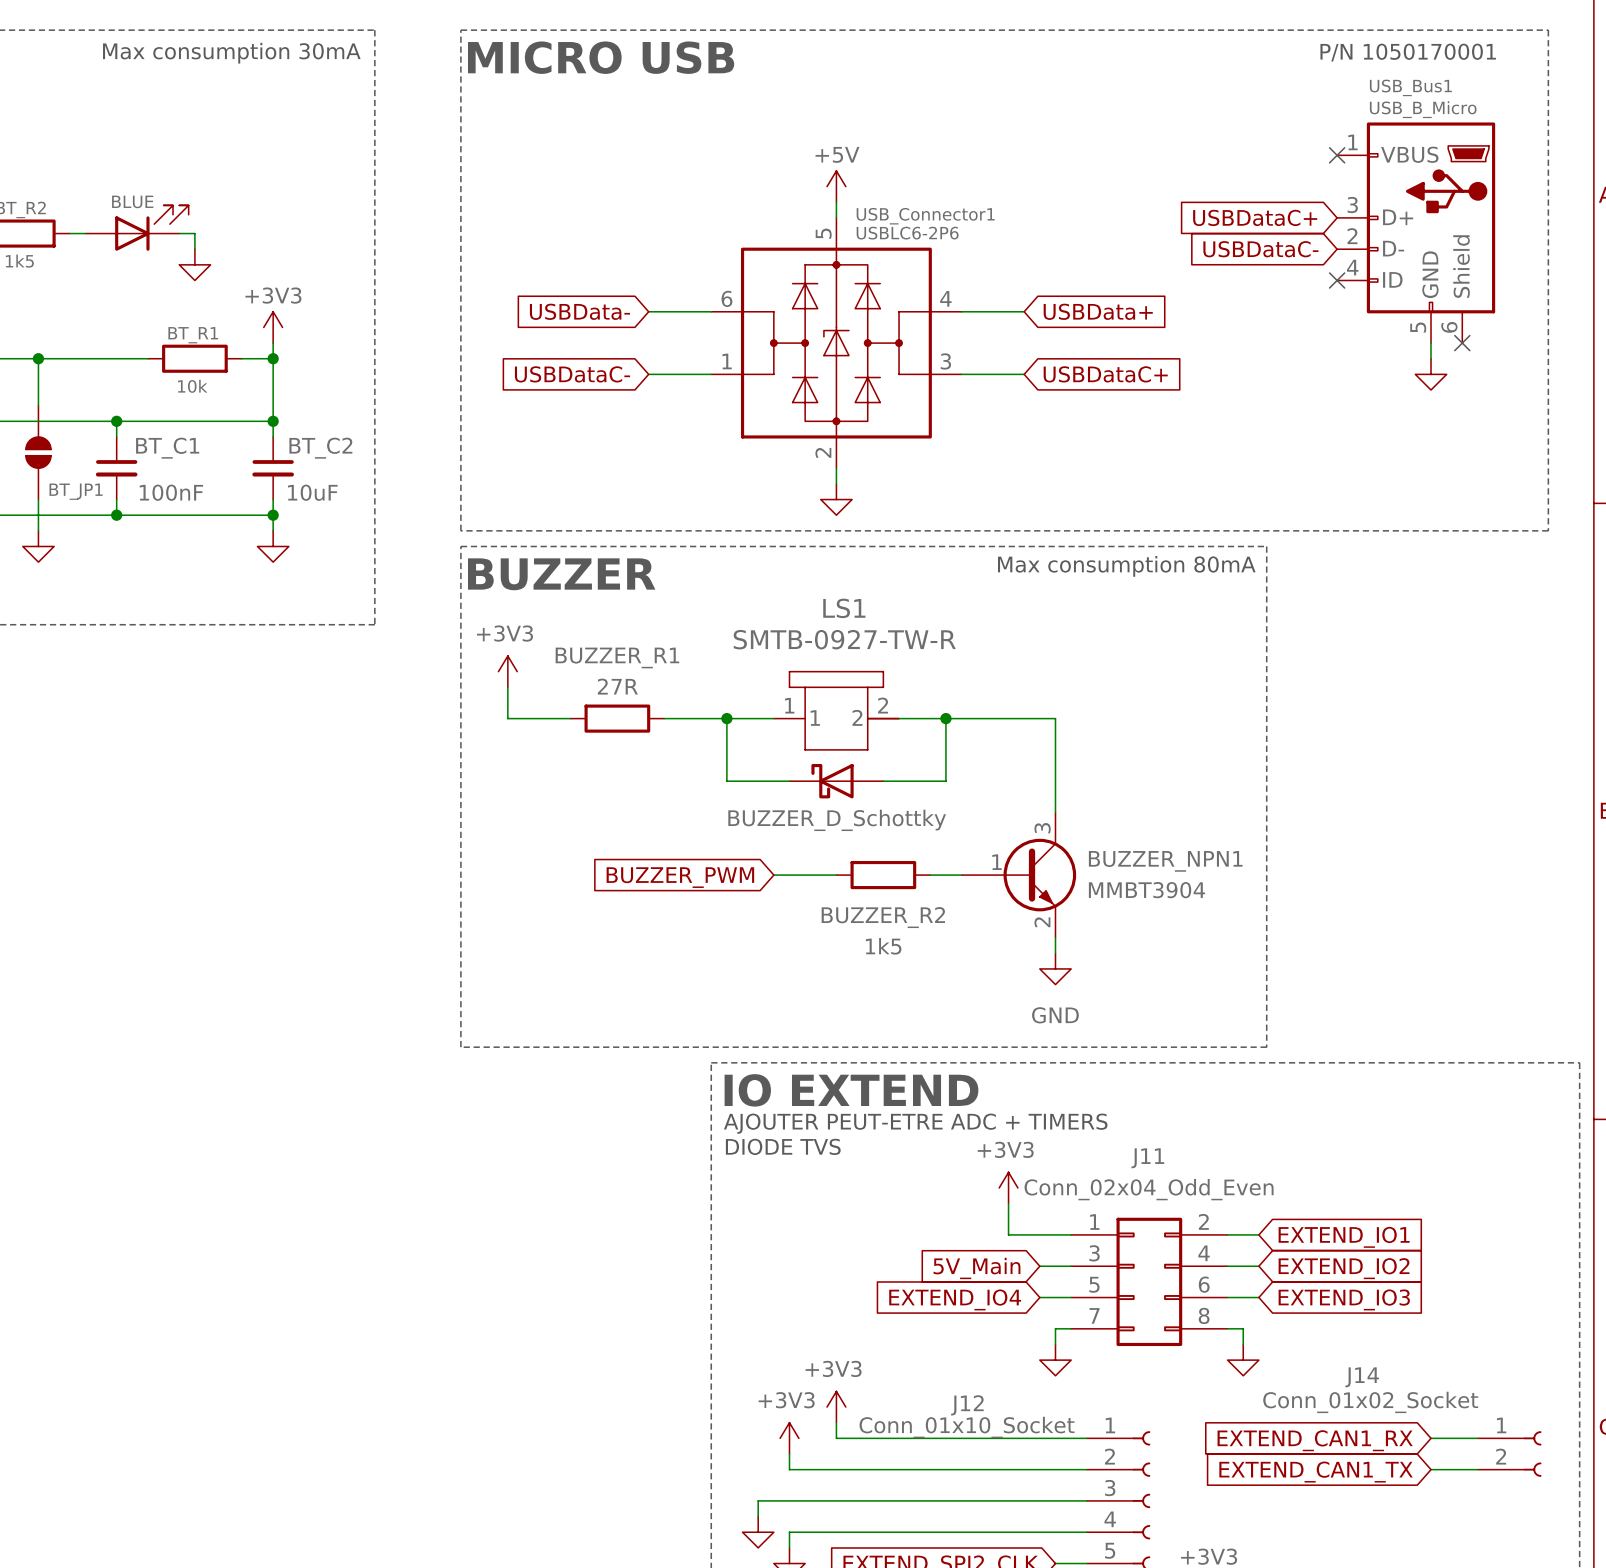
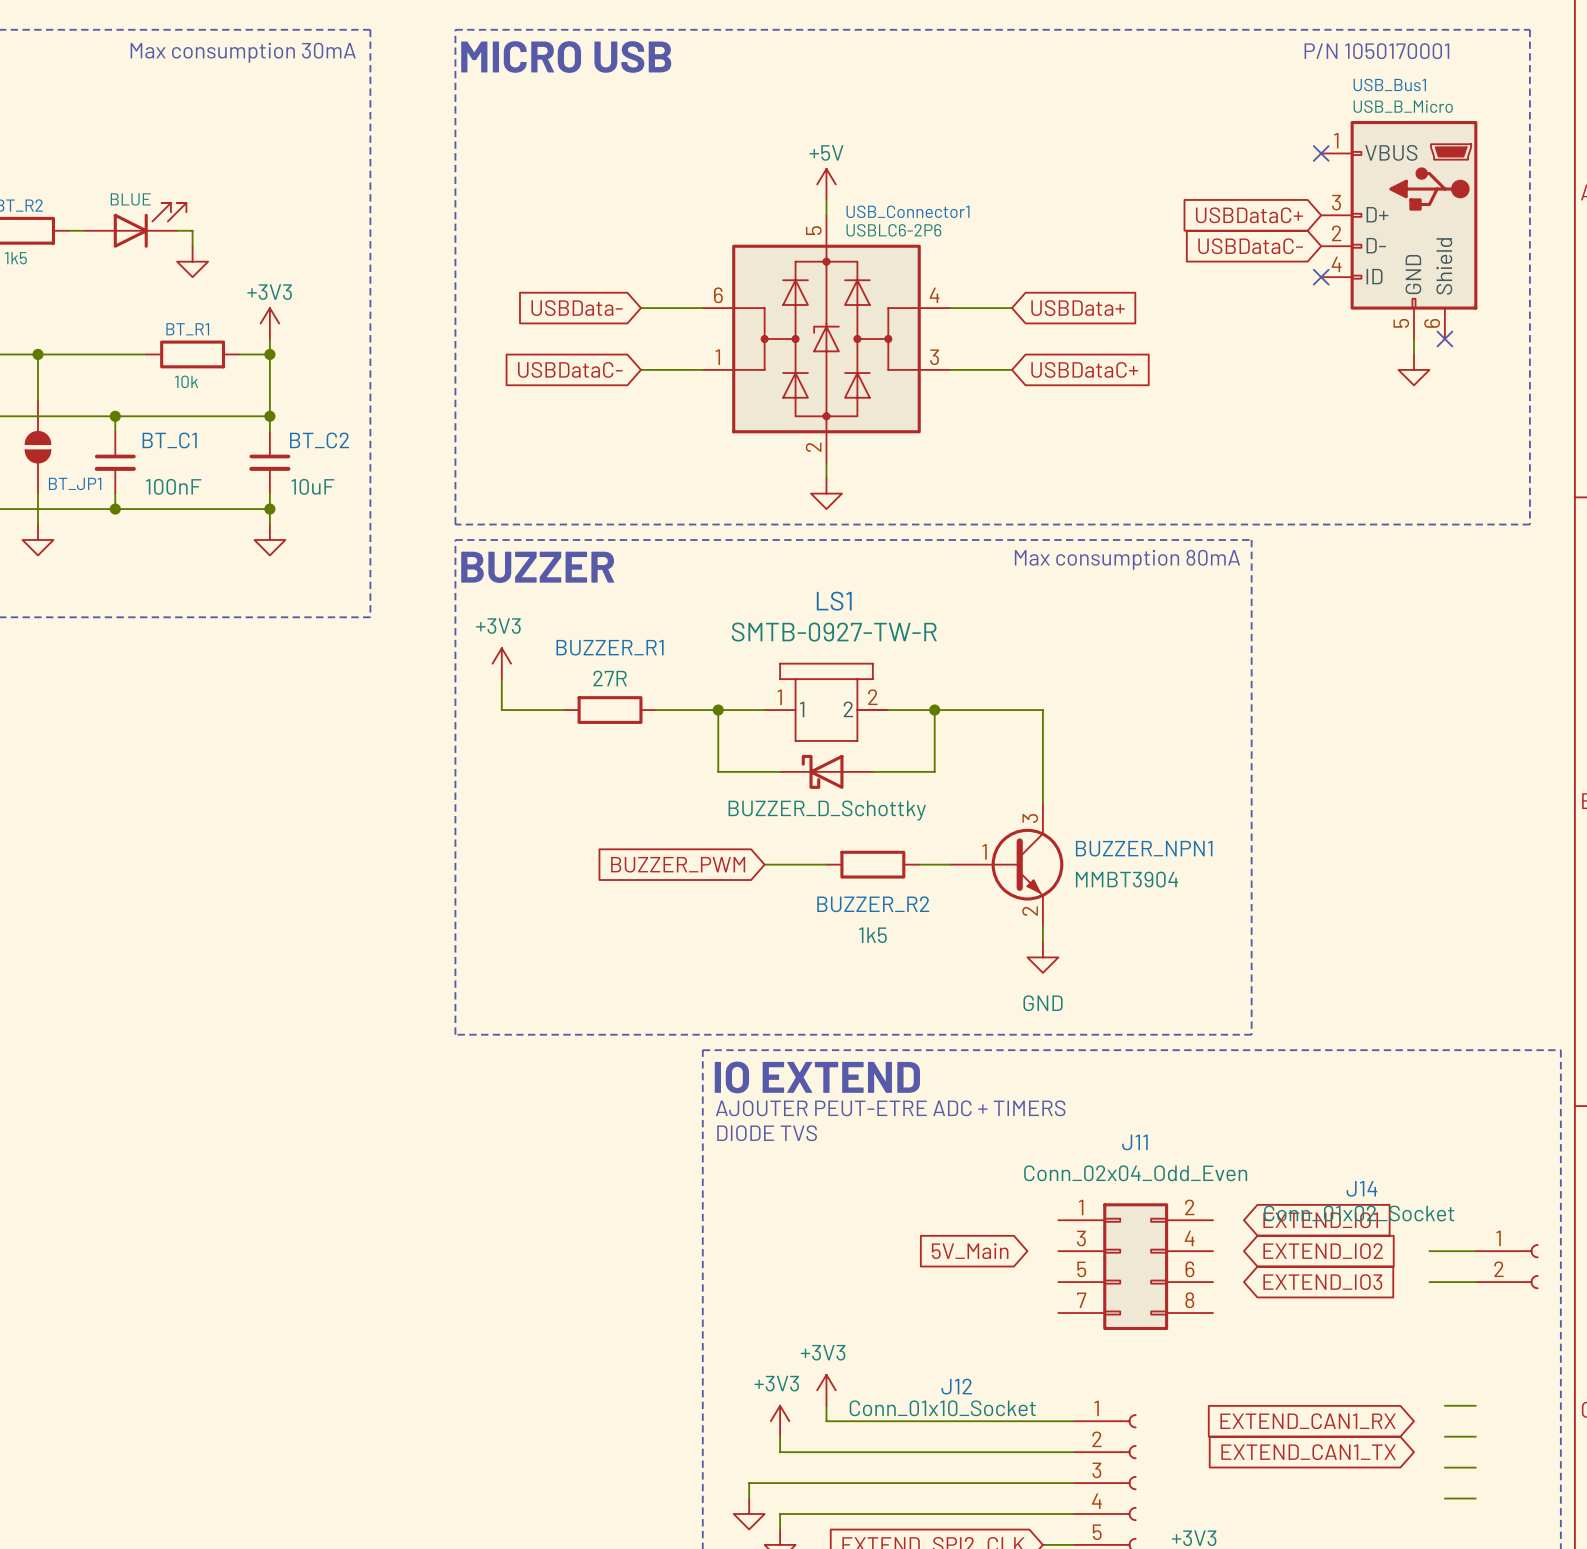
power symbol: +3V3 (1008, 1188) -> none
wire: (1008, 1203) (1008, 1234) (1071, 1234) -> none
wire: (1227, 1234) (1258, 1234) -> (1444, 1405) (1475, 1405)
wire: (1039, 1266) (1071, 1266) -> none
wire: (1227, 1266) (1258, 1266) -> (1444, 1436) (1475, 1436)
wire: (1039, 1297) (1071, 1297) -> none
wire: (1227, 1297) (1258, 1297) -> (1444, 1467) (1475, 1467)
global label: EXTEND_IO4 (955, 1299) -> none
wire: (1071, 1328) (1055, 1328) (1055, 1344) -> none
wire: (1227, 1328) (1243, 1328) (1243, 1344) -> none
power symbol: (1055, 1360) -> none
power symbol: (1243, 1360) -> none
wire: (1431, 1438) (1477, 1438) -> (1429, 1251) (1475, 1251)
J14 position: (1509, 1454) -> (1507, 1266)
wire: (1431, 1469) (1477, 1469) -> (1429, 1282) (1475, 1282)
wire: none -> (1444, 1498) (1475, 1498)

